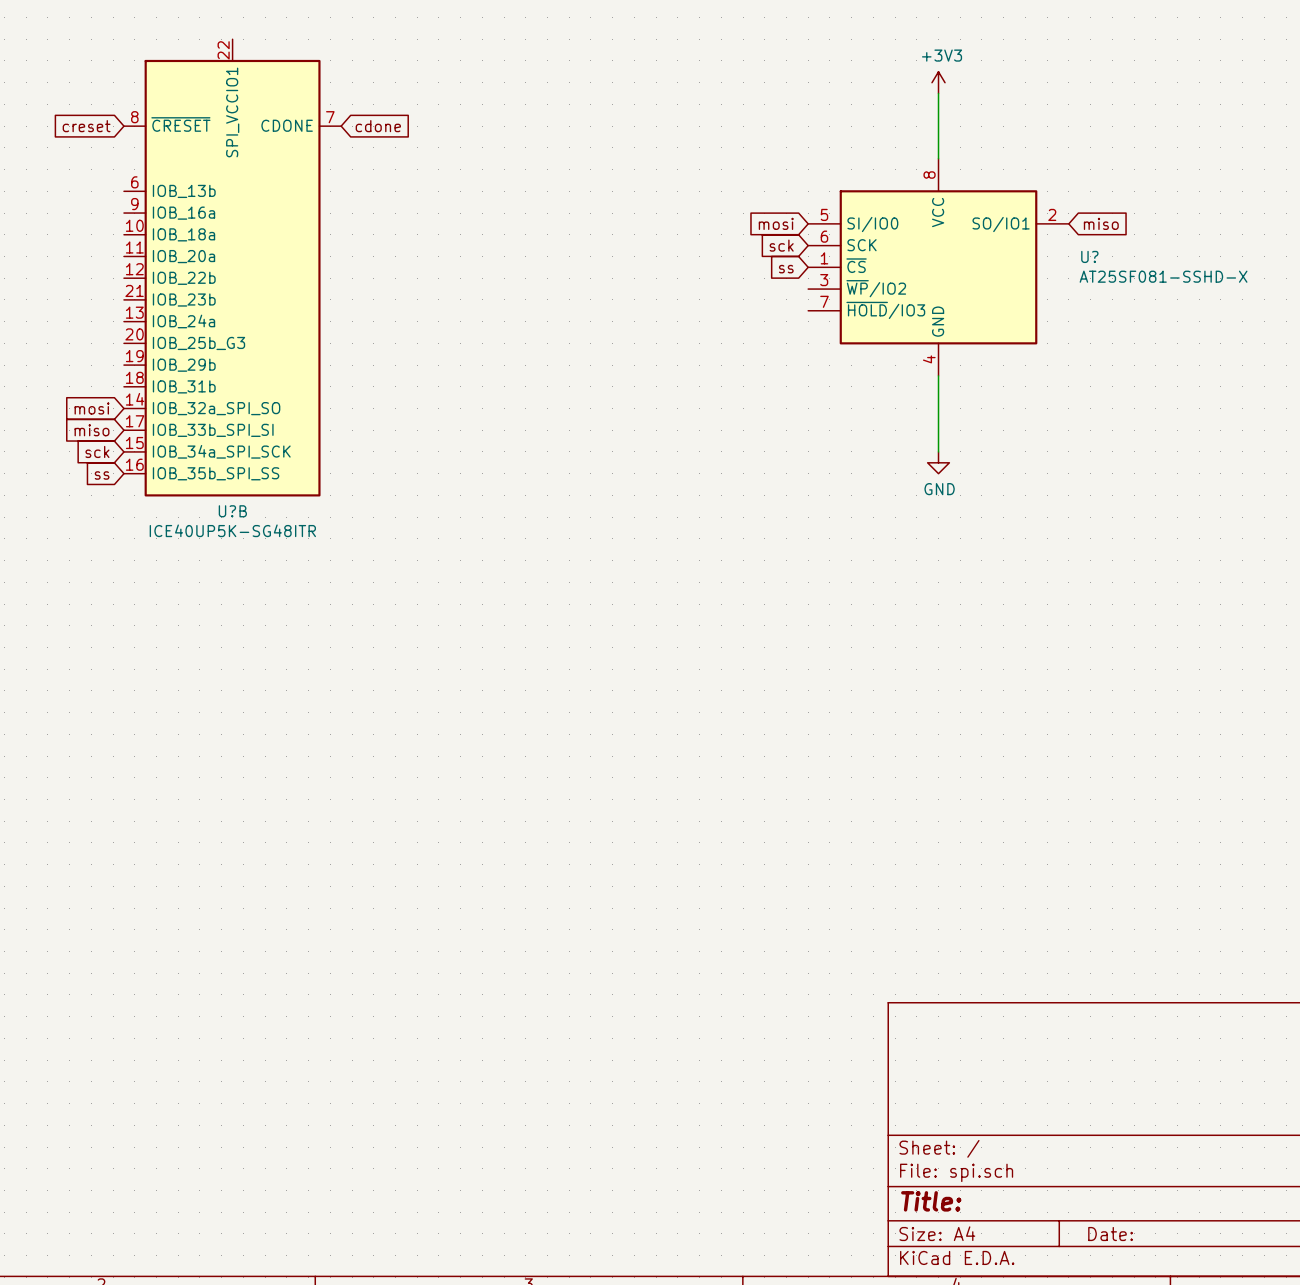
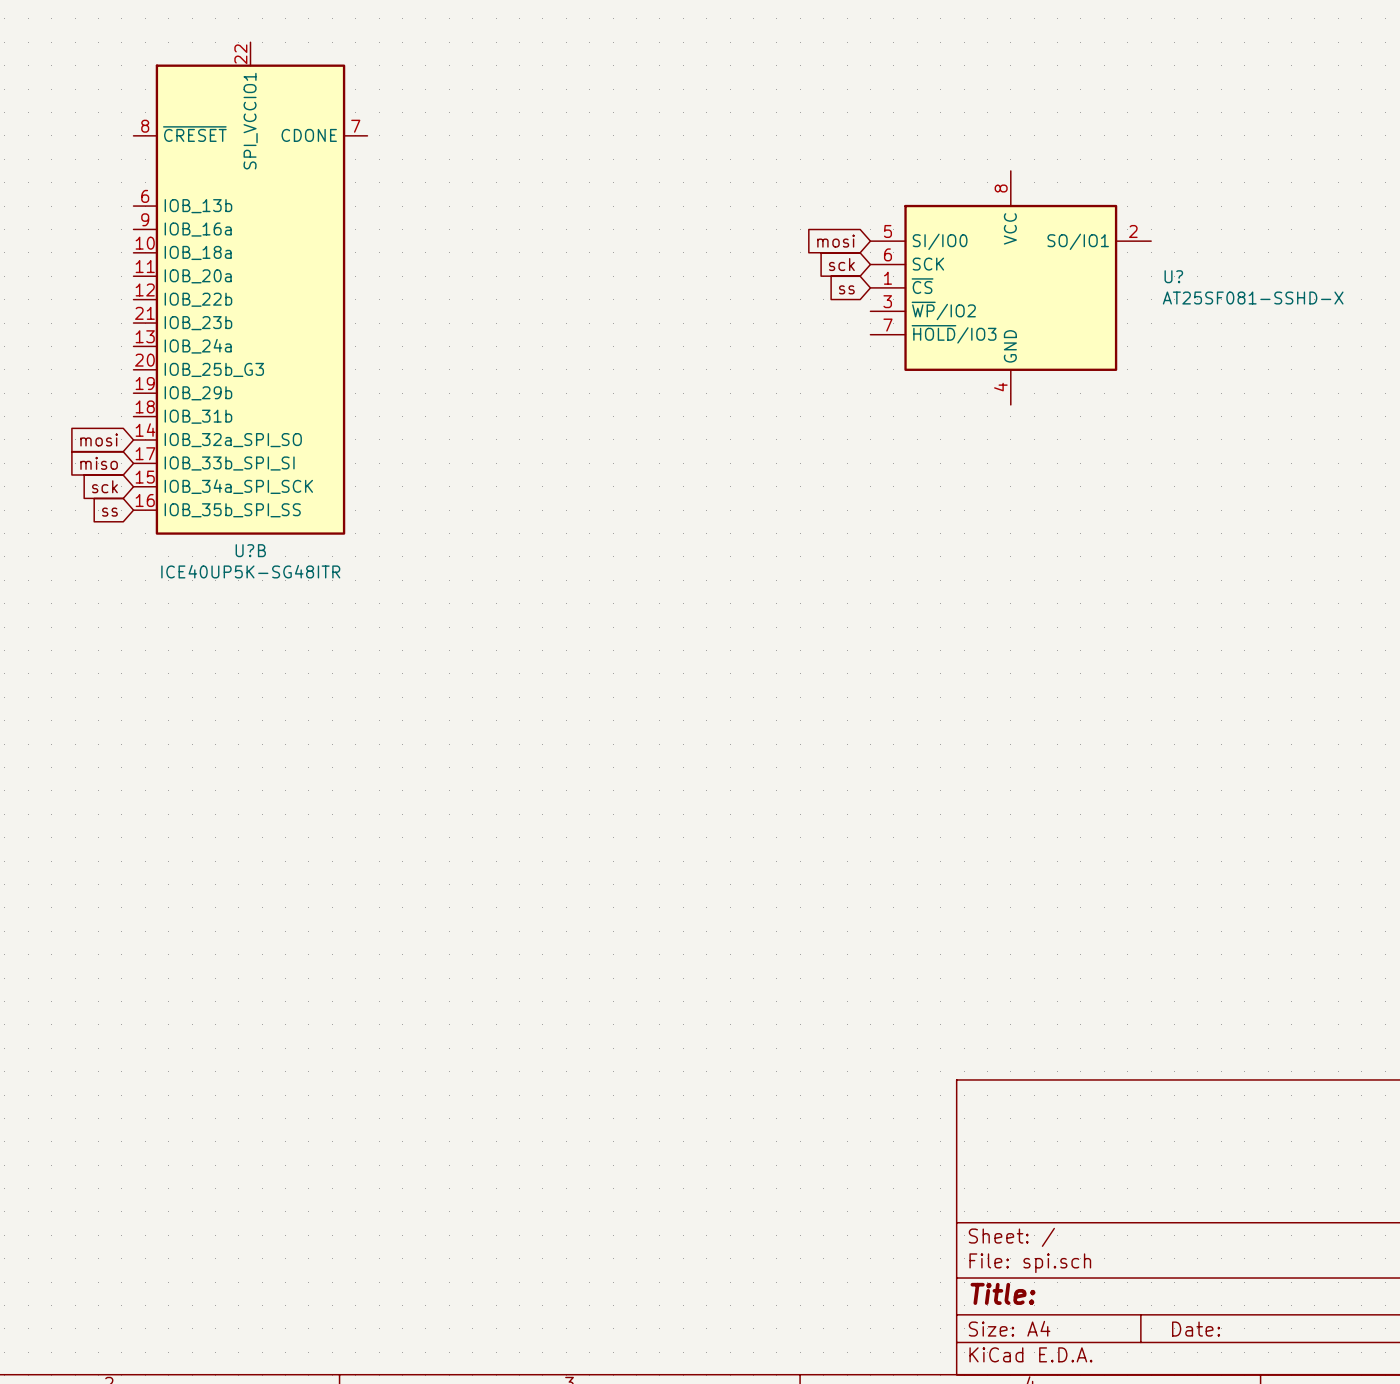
power symbol: +3V3 (938, 82) -> none
wire: (938, 93) (938, 158) -> none
global label: creset (86, 126) -> none
global label: cdone (378, 126) -> none
global label: miso (1101, 223) -> none
wire: (938, 375) (938, 451) -> none
power symbol: GND (938, 462) -> none

